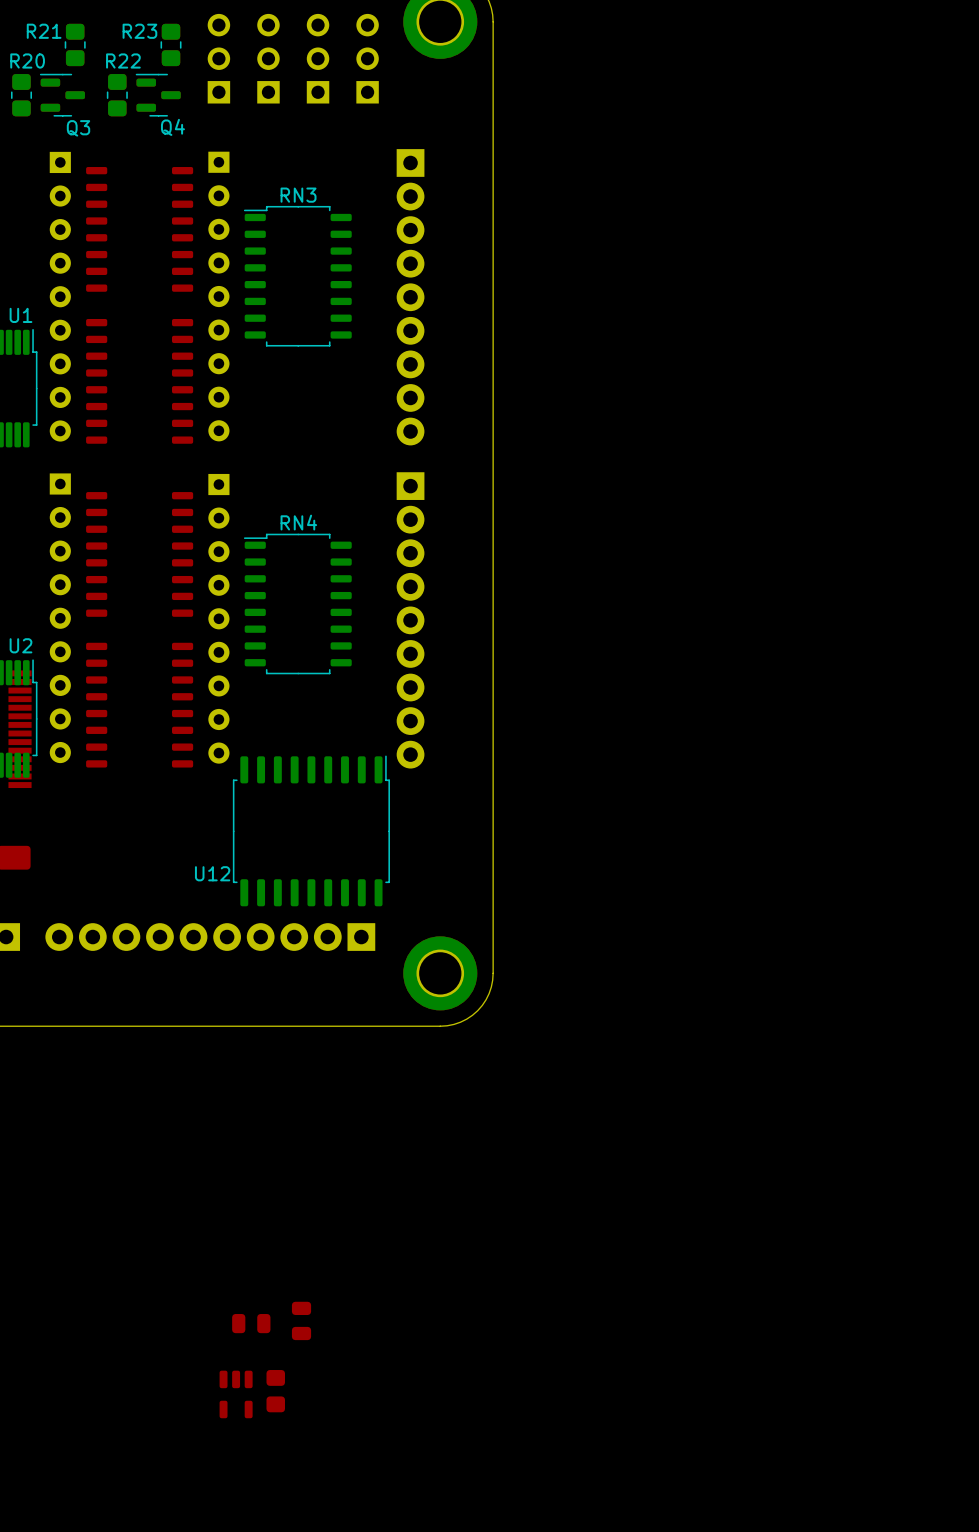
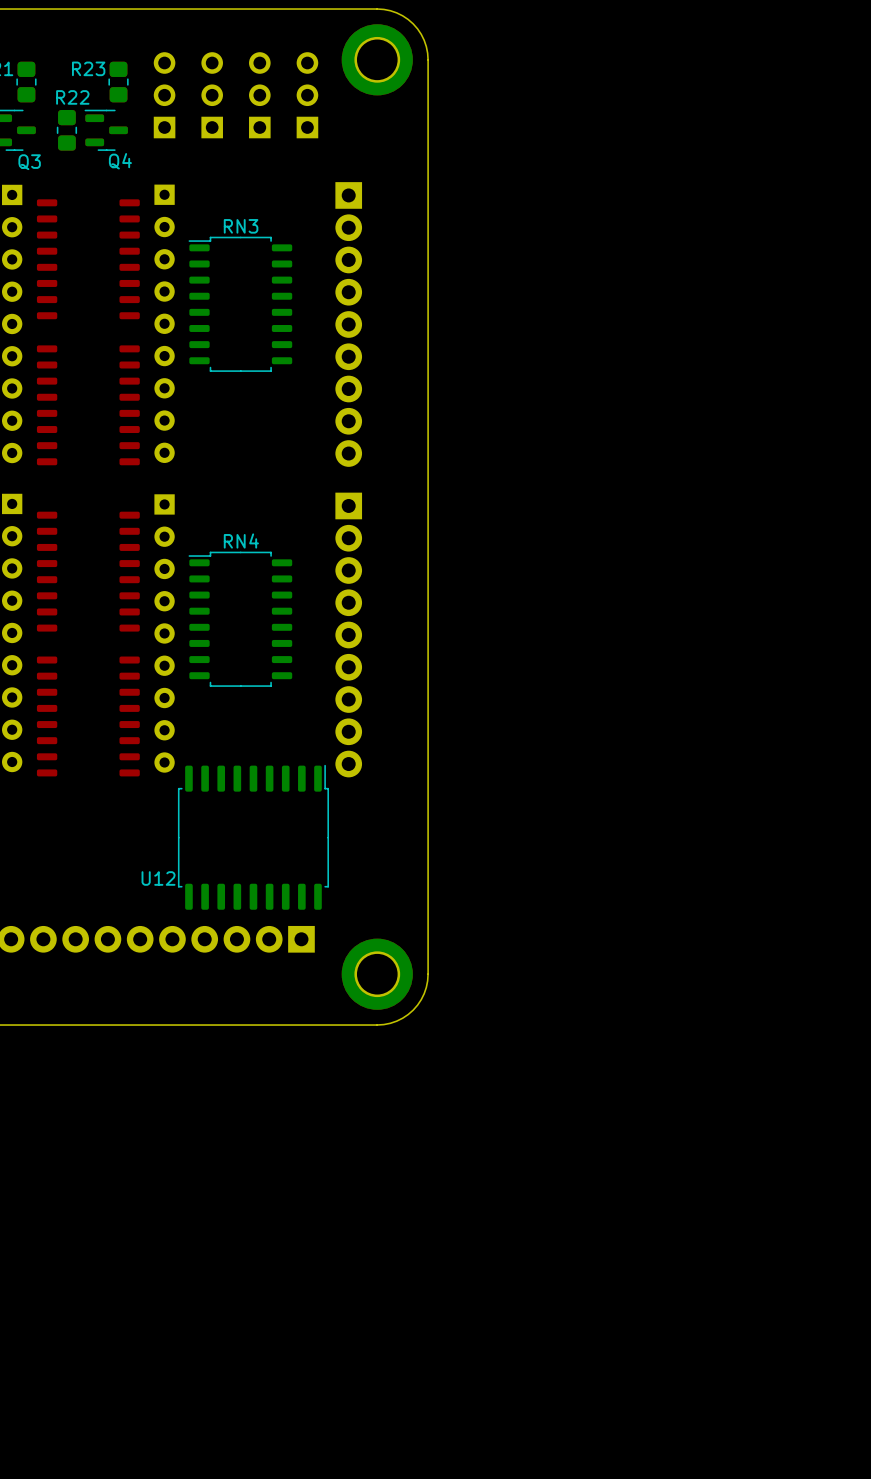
part: (301, 1320) -> none
part: (251, 1323) -> none
part: (275, 1391) -> none
part: (236, 1394) -> none

